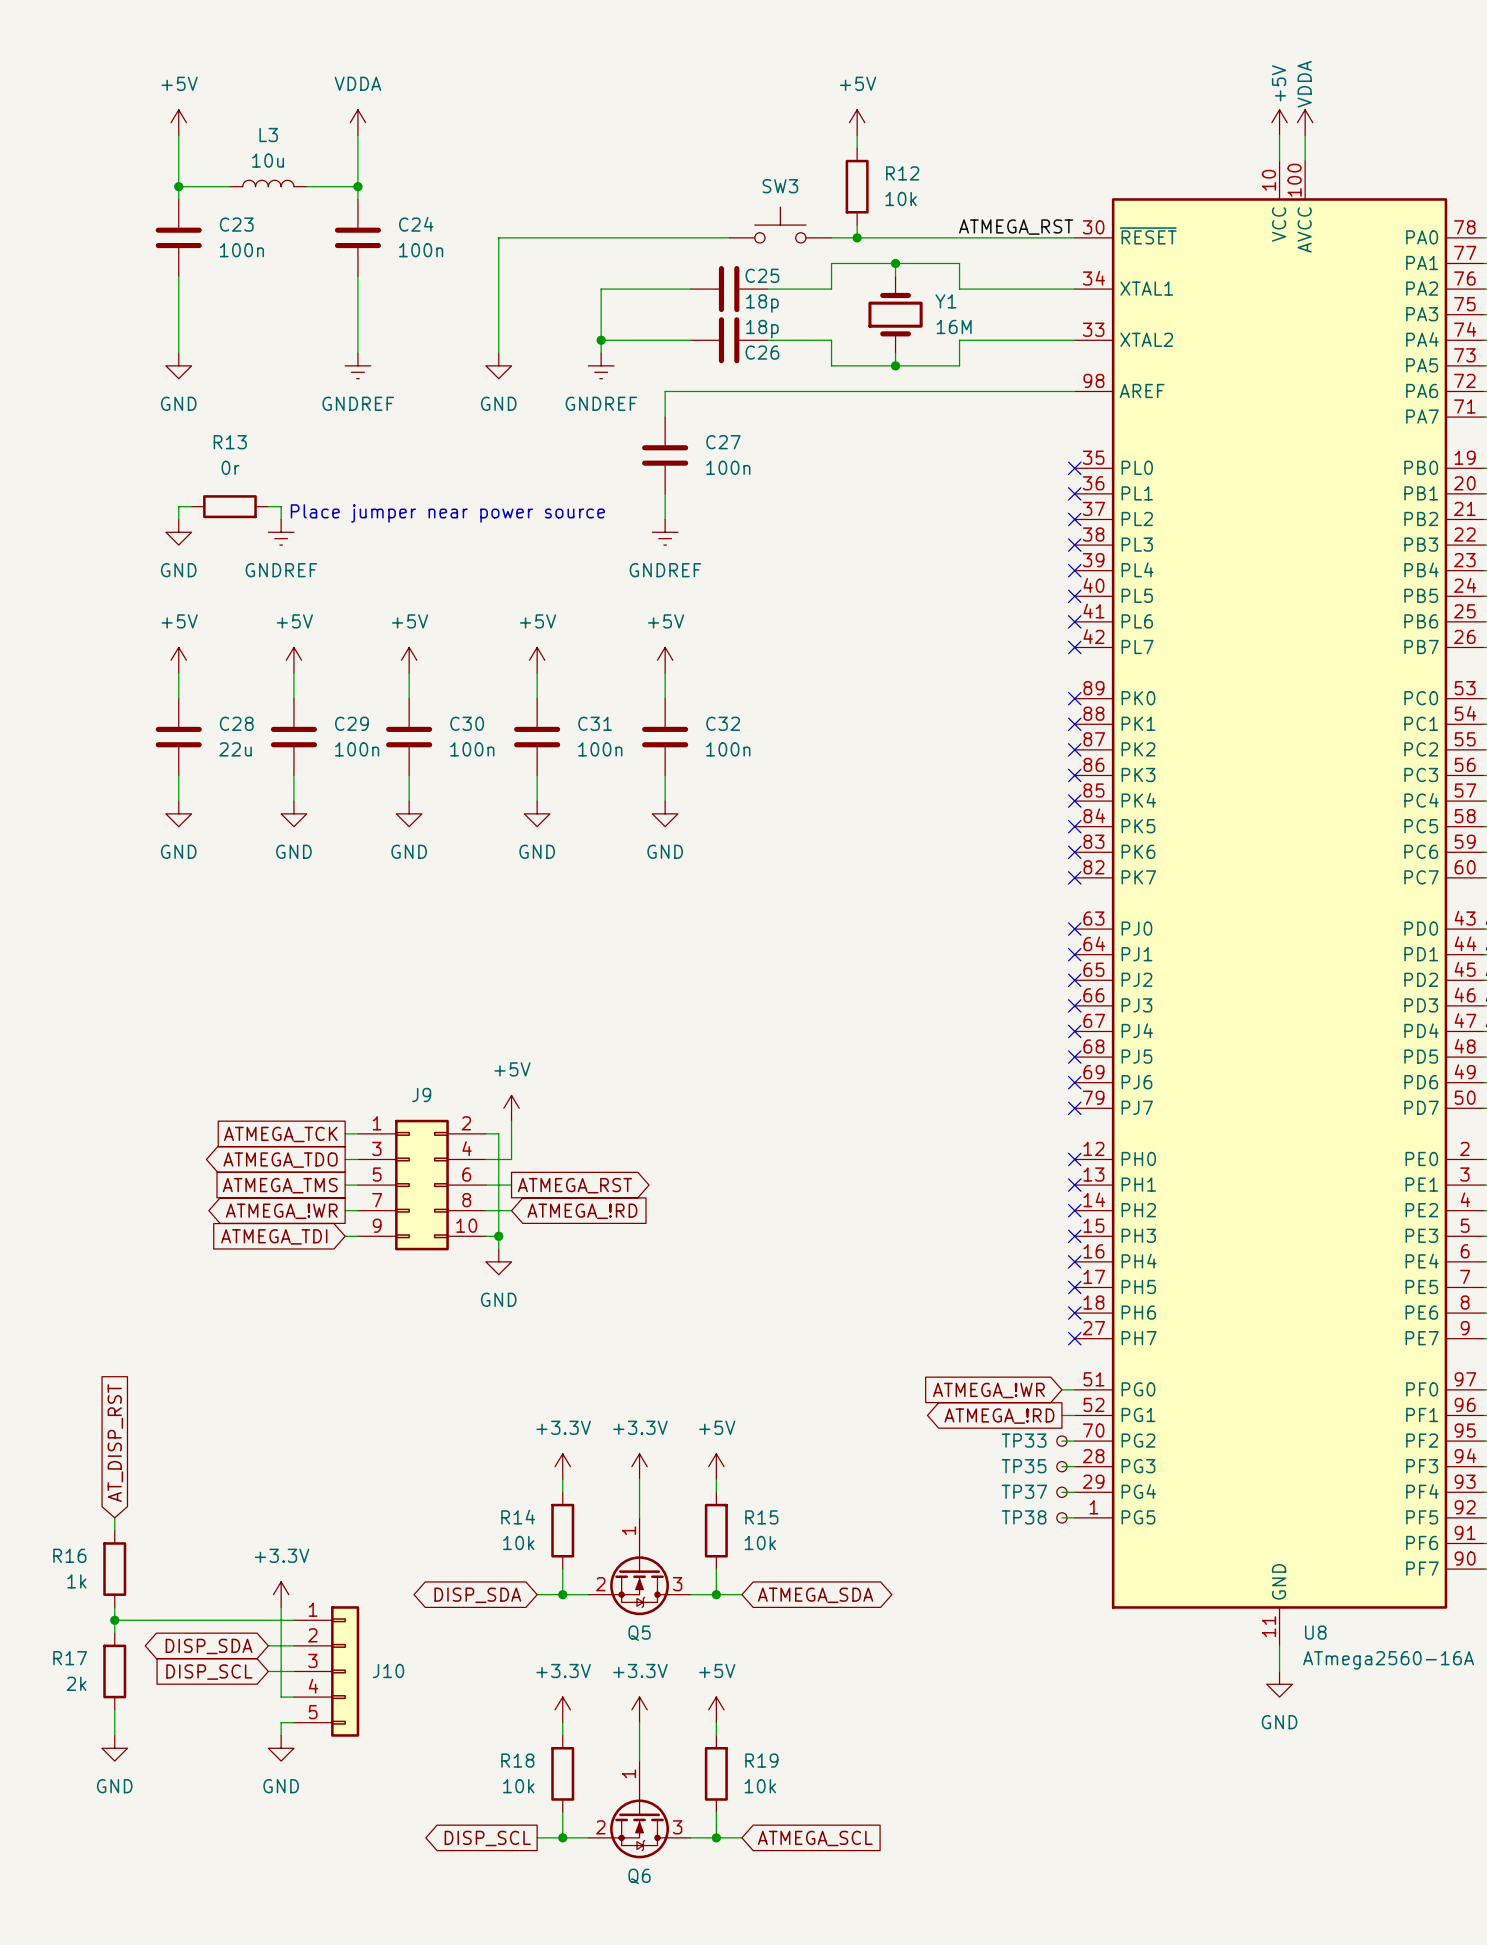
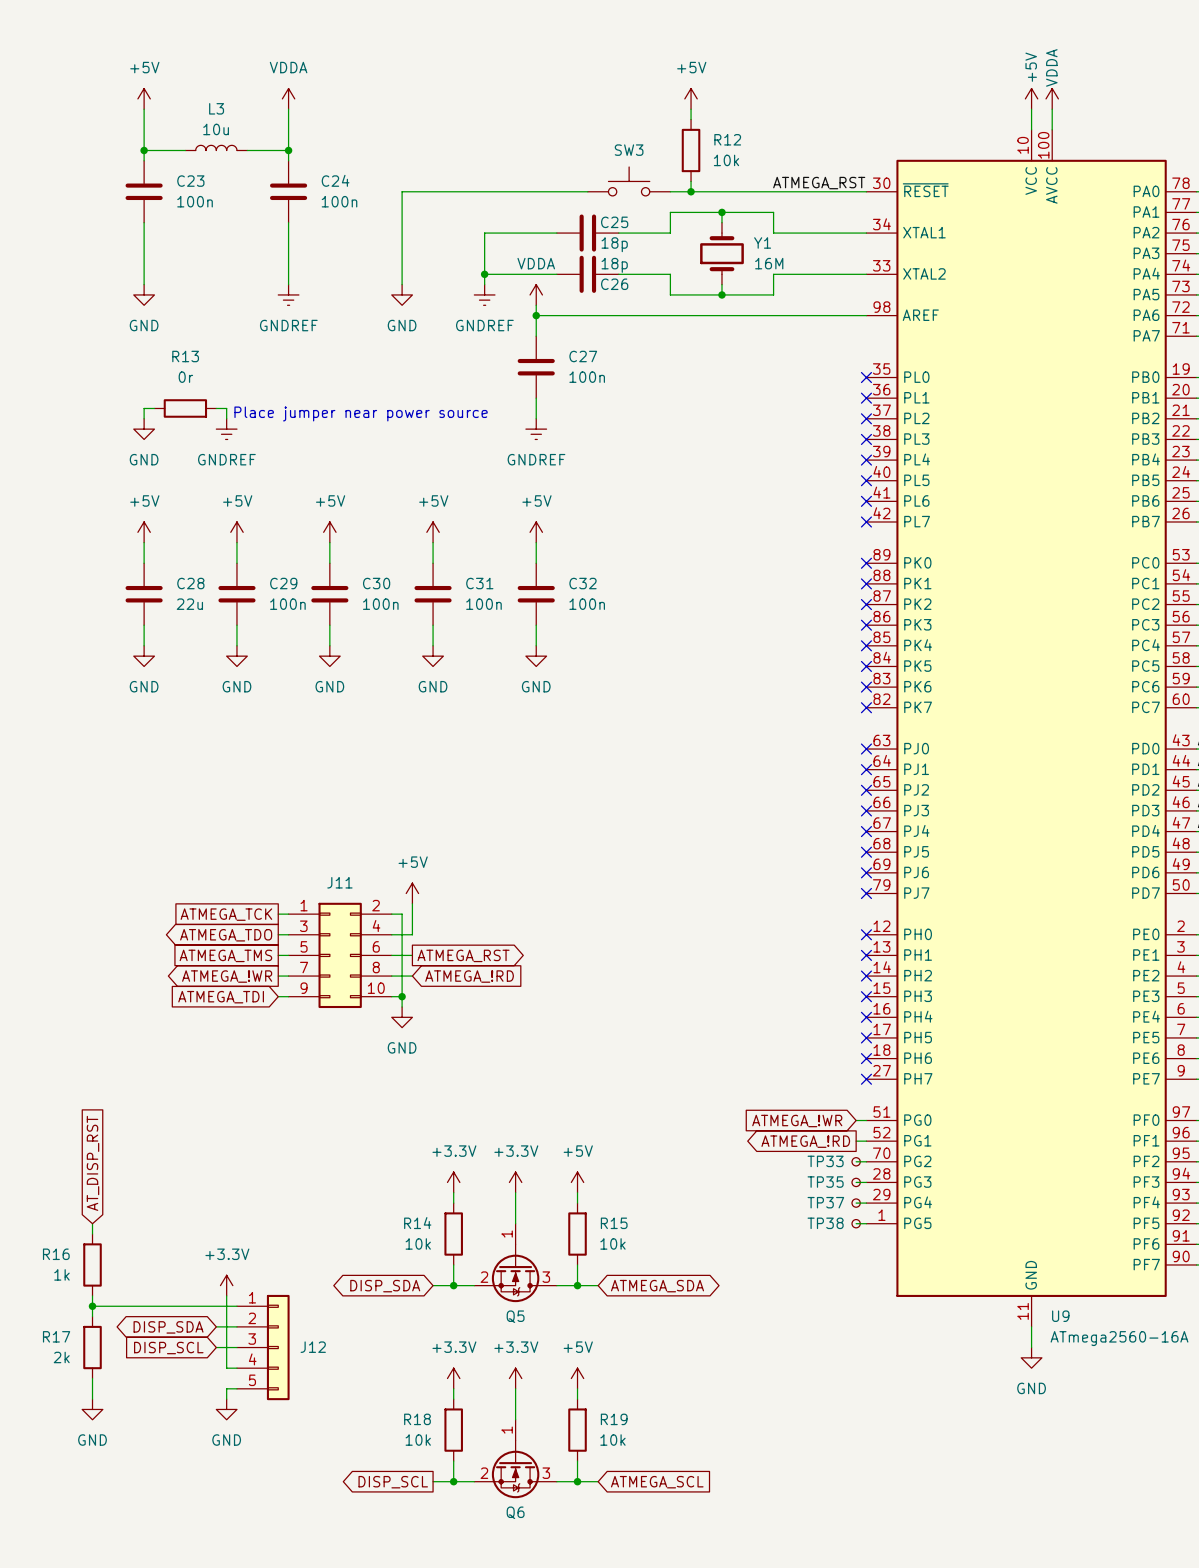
power symbol: none -> VDDA (536, 294)
wire: none -> (536, 305) (536, 315)
junction: none -> (536, 315)
J9 name: J9 (421, 1094) -> J11 (339, 882)
U8 name: U8 (1315, 1632) -> U9 (1060, 1316)
J10 name: J10 (388, 1670) -> J12 (313, 1347)

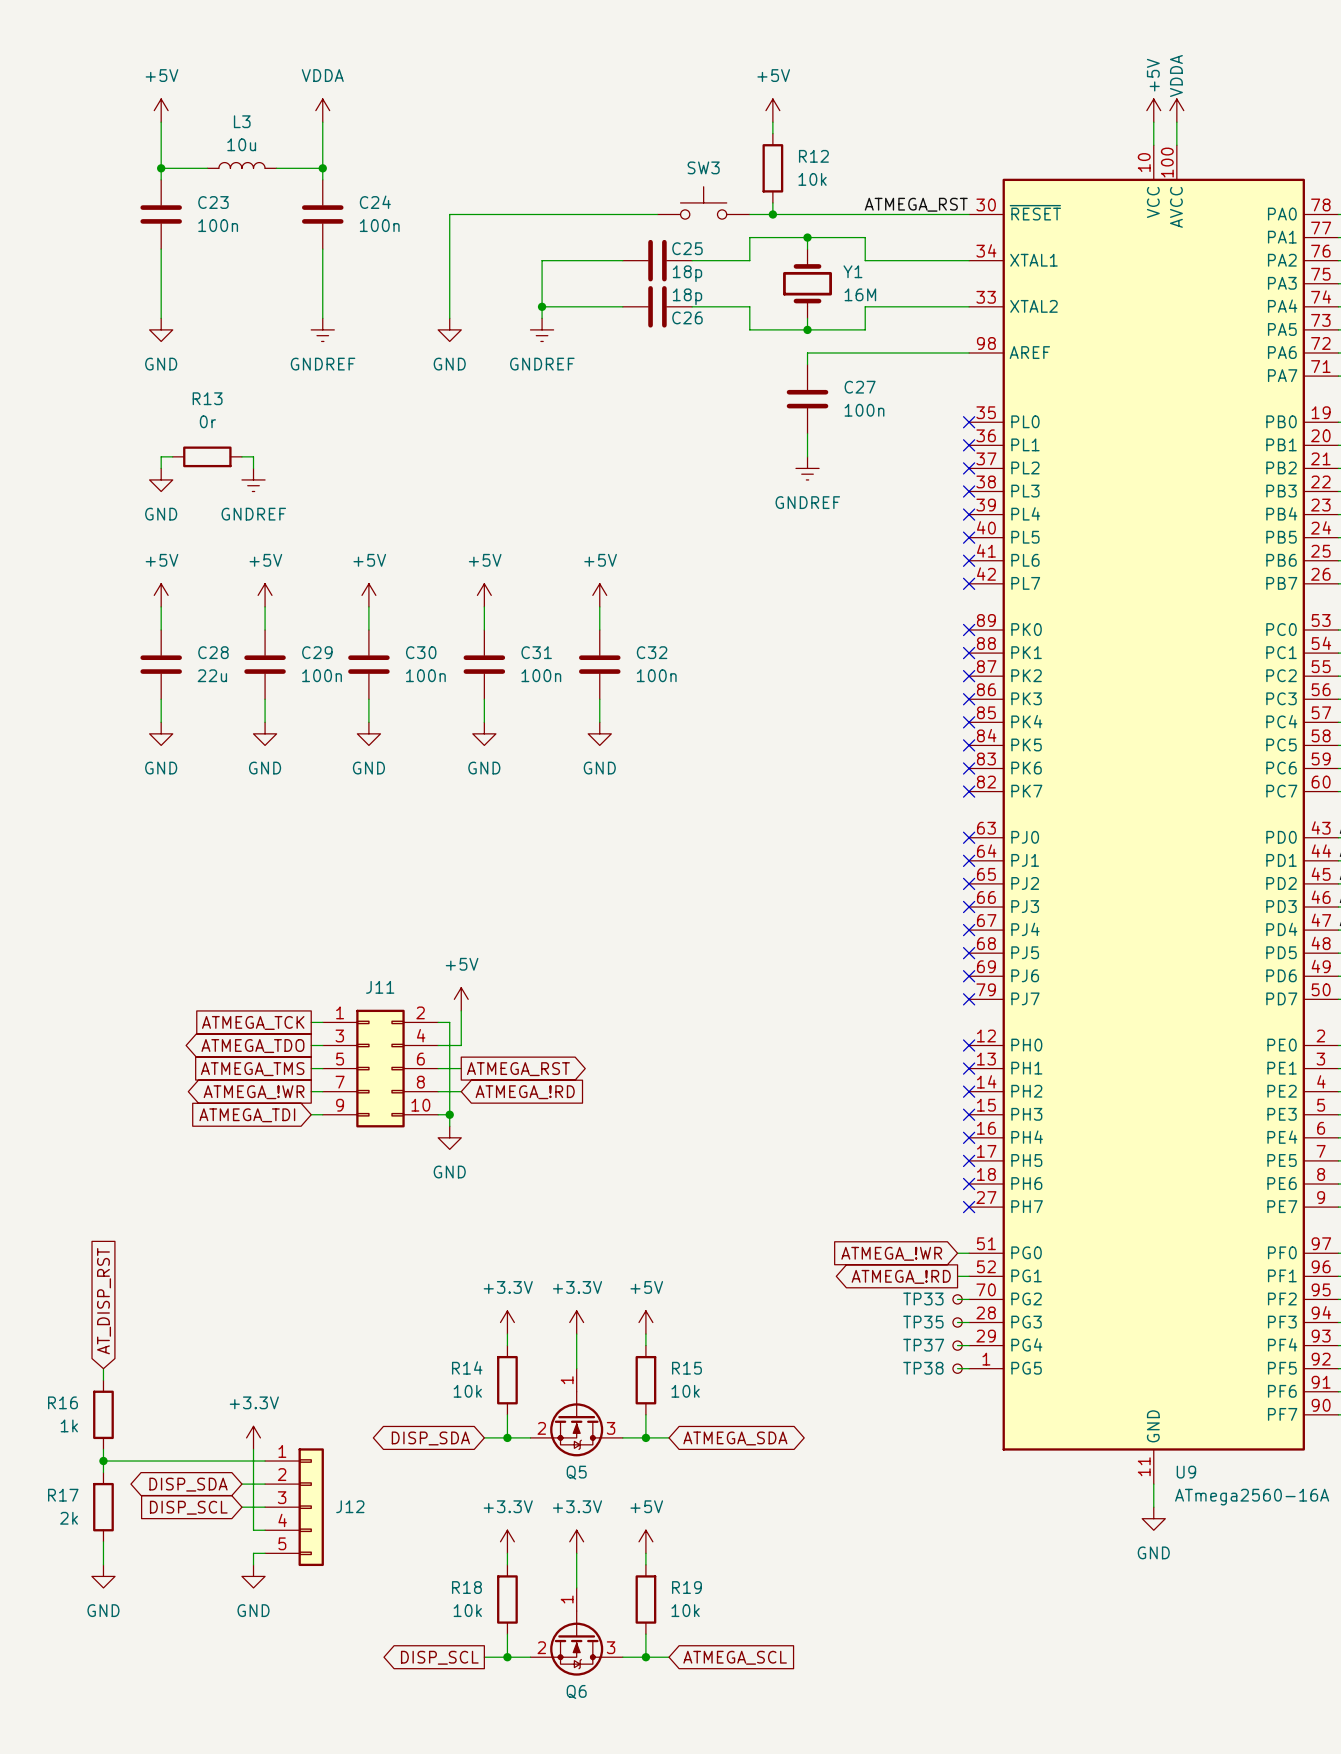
power symbol: VDDA (536, 294) -> none
wire: (536, 305) (536, 336) -> none
wire: (536, 315) (721, 315) -> (807, 364) (807, 352)
junction: (536, 315) -> none
C27 position: (536, 367) -> (807, 399)
wire: (536, 398) (536, 418) -> (807, 433) (807, 456)
text: Place jumper near power source (361, 413) -> none
power symbol position: GNDREF (536, 429) -> GNDREF (807, 468)

